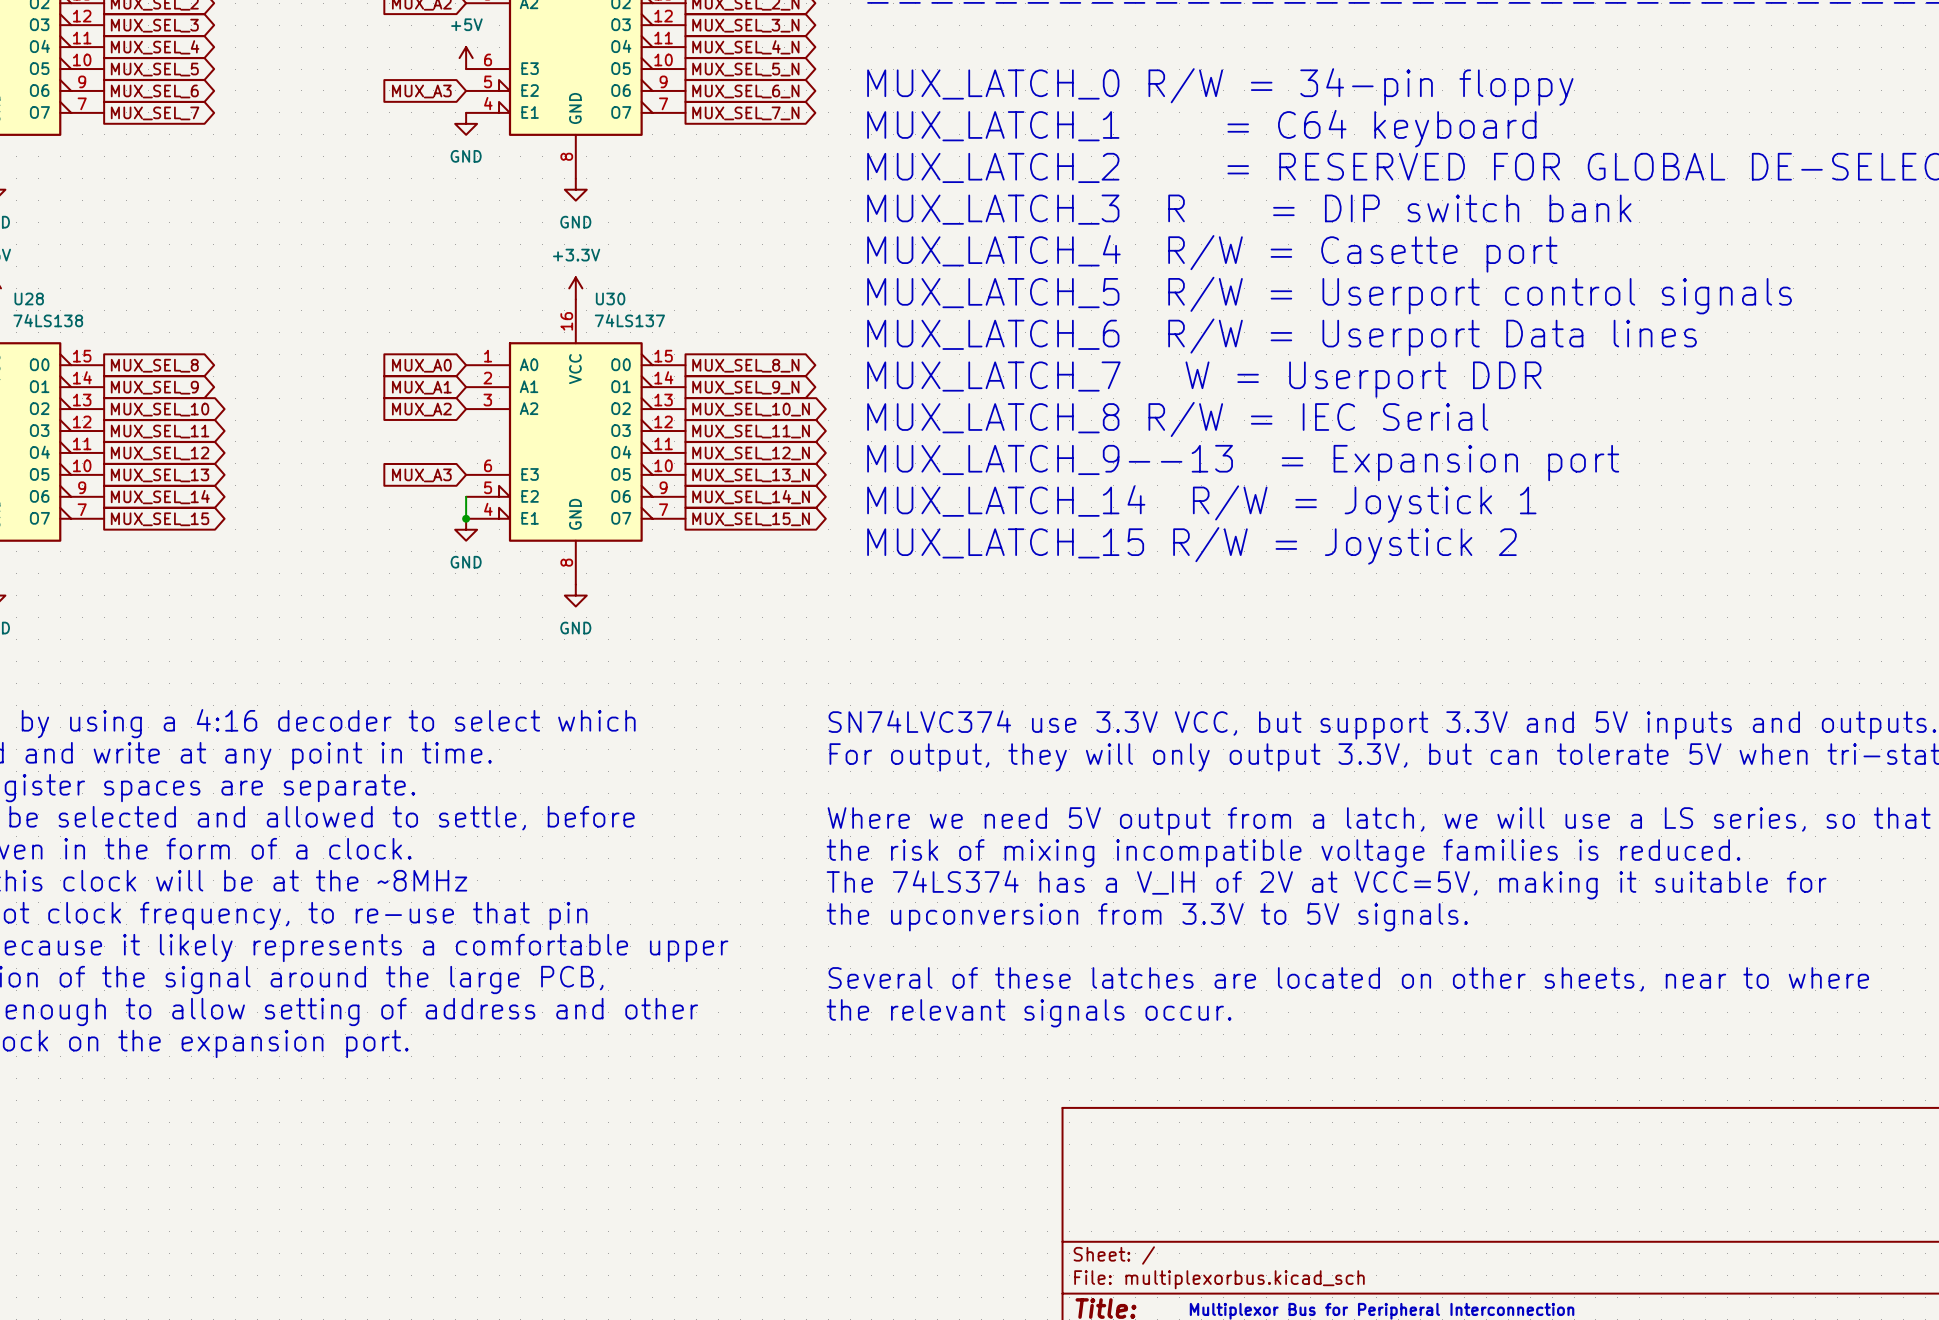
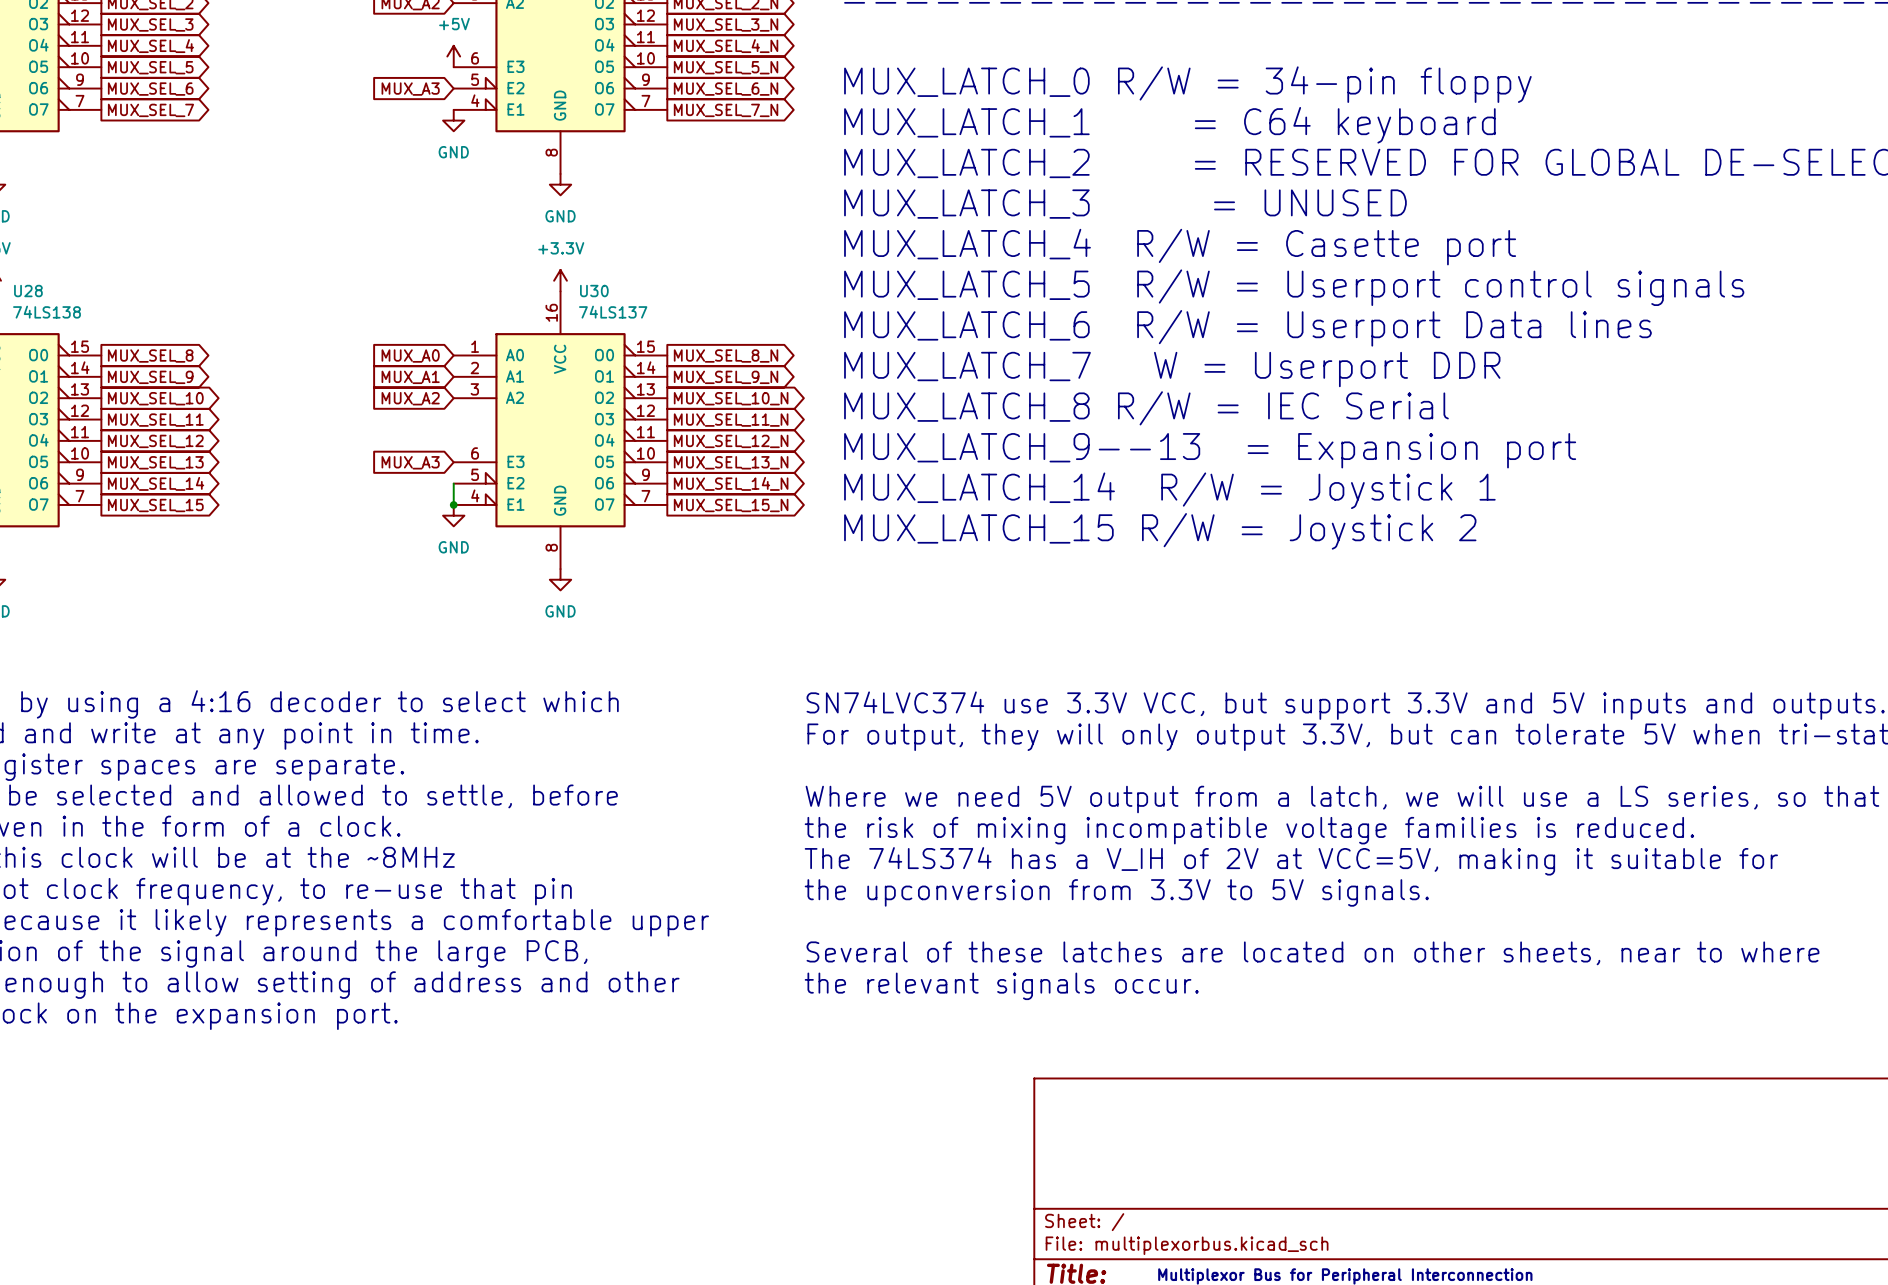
text: MUX_LATCH_3 R = DIP switch bank (1249, 209) -> MUX_LATCH_3 = UNUSED (1125, 204)

